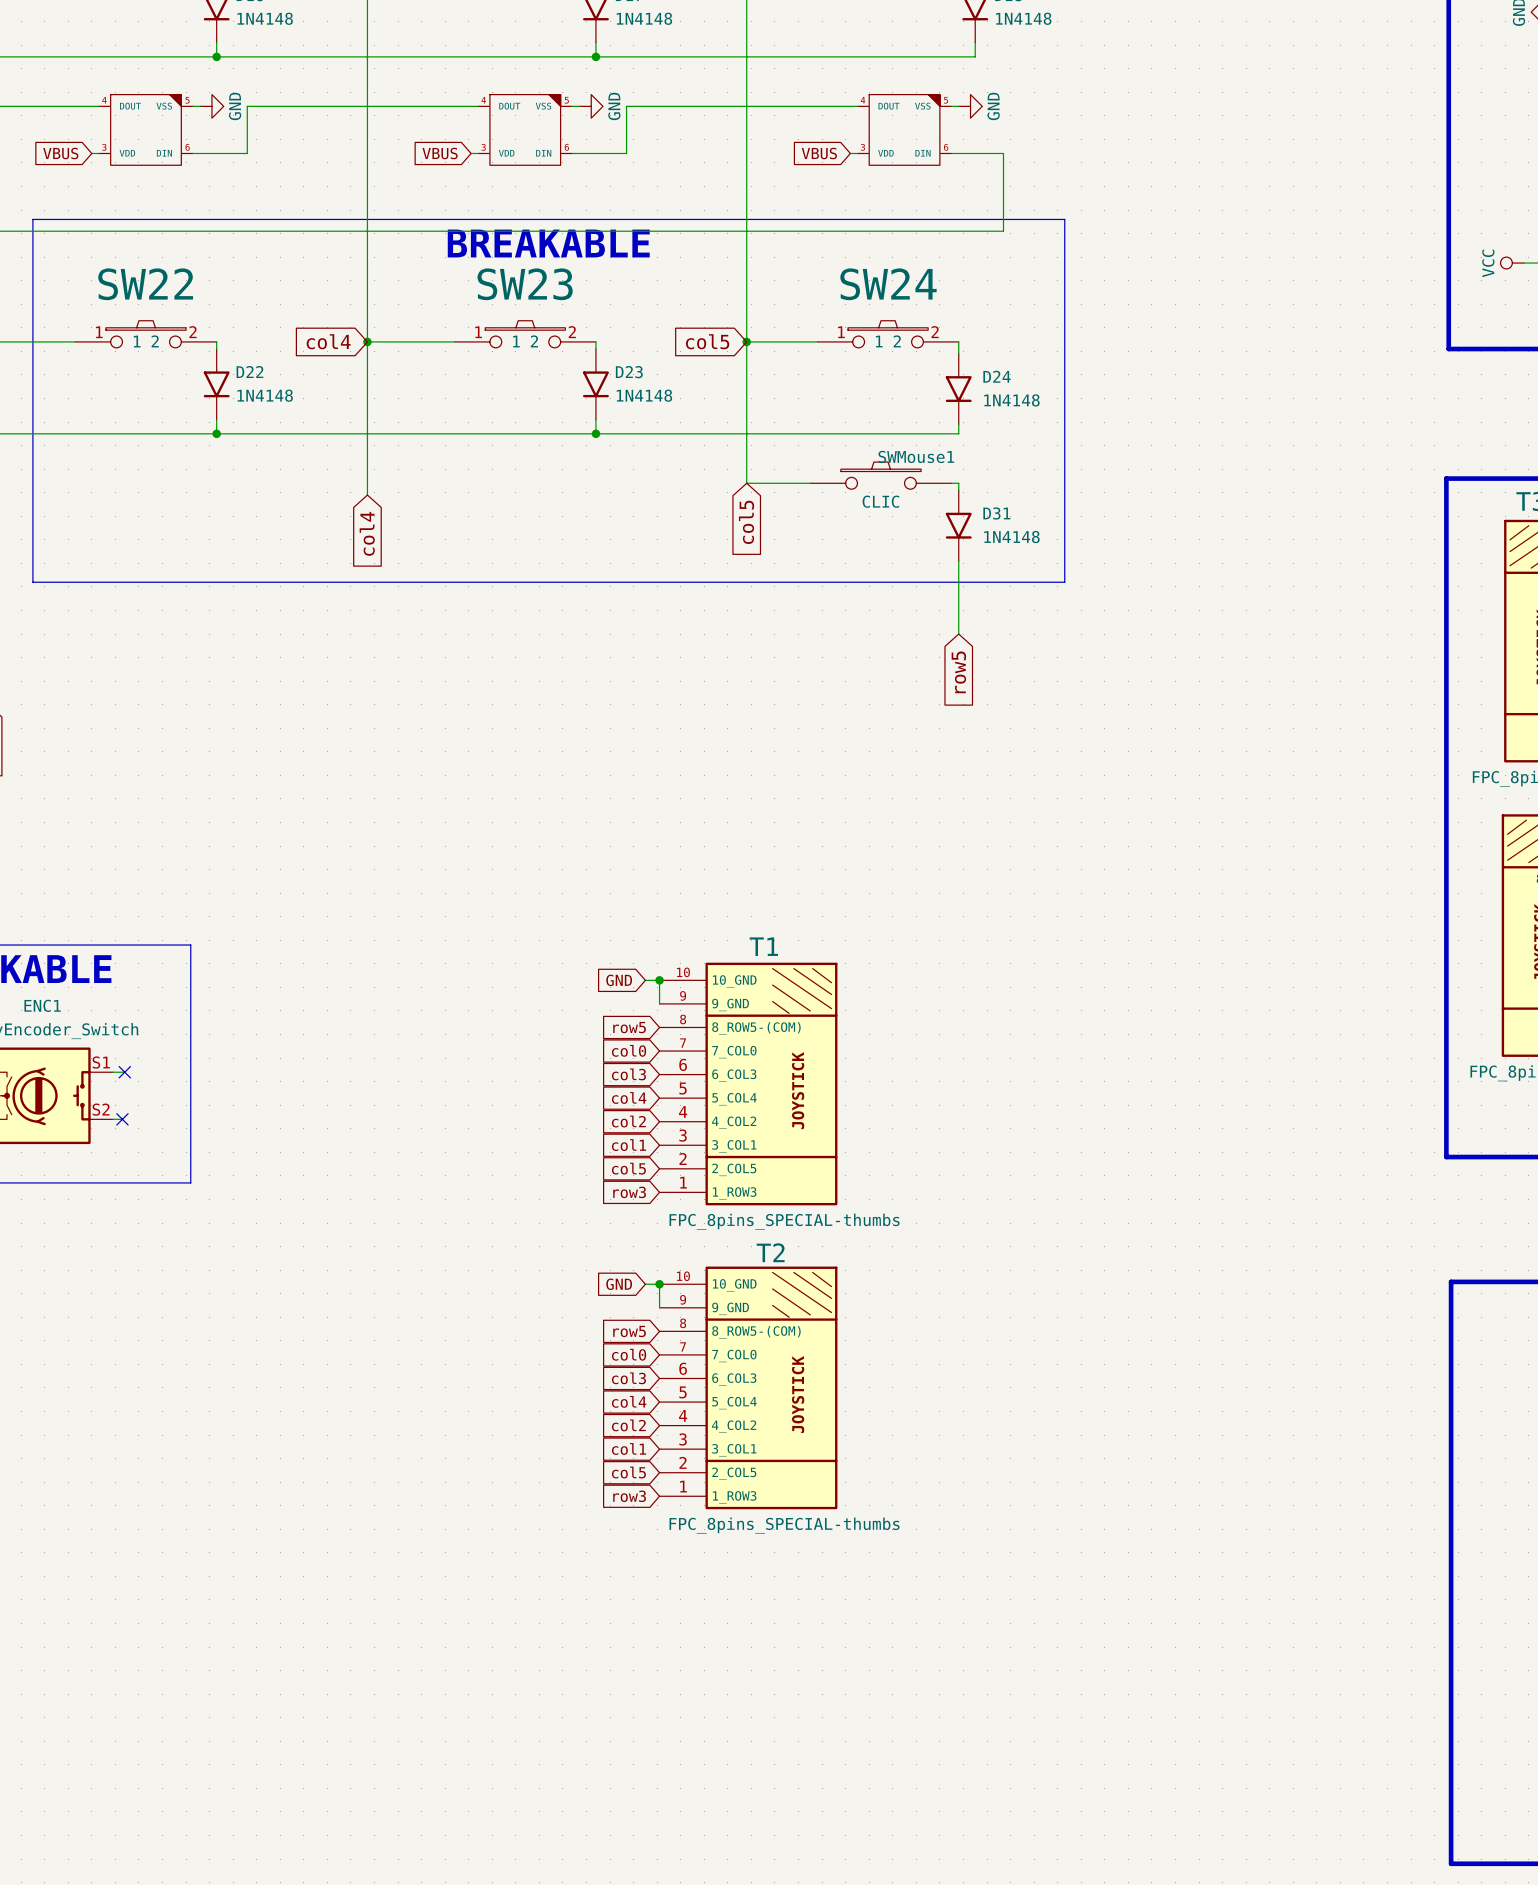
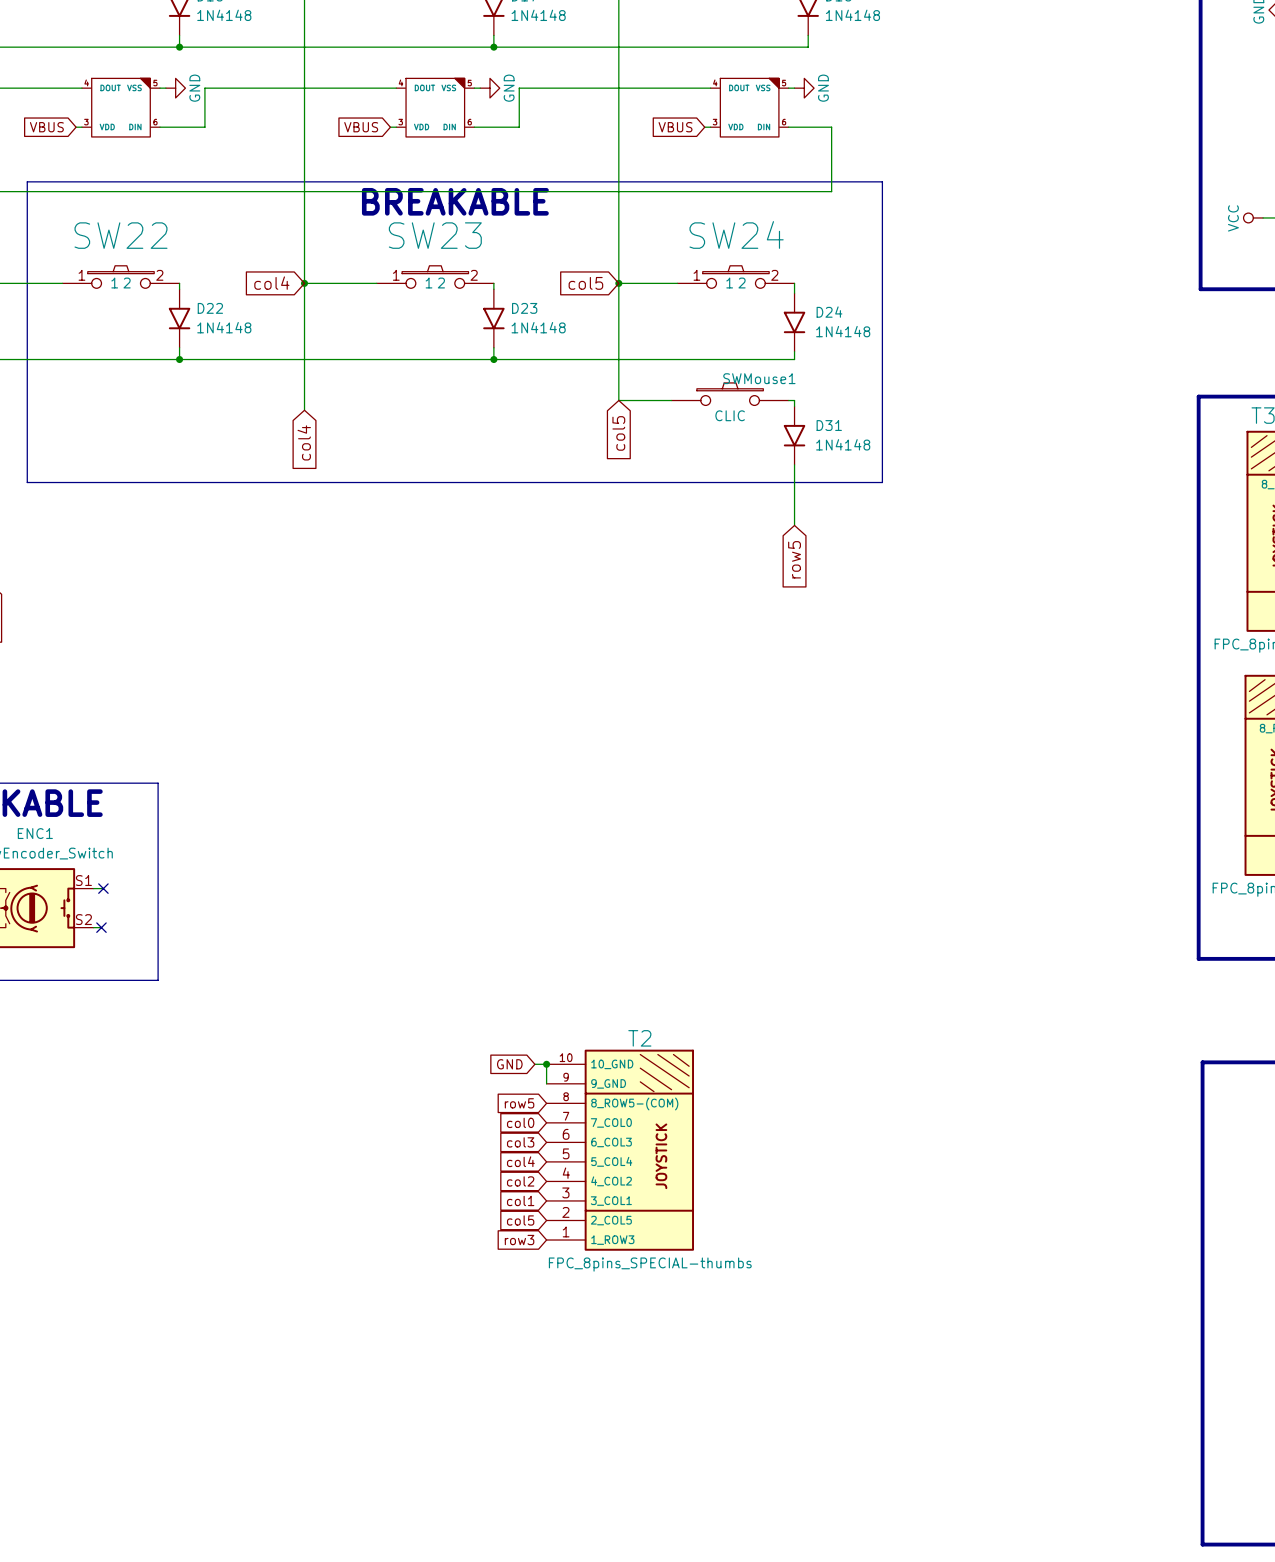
global label: GND (619, 980) -> none
wire: (645, 980) (659, 980) (659, 1003) -> none
junction: (659, 980) -> none
global label: row5 (629, 1027) -> none
global label: col0 (629, 1050) -> none
global label: col3 (628, 1074) -> none
T1: FPC_8pins_SPECIAL-thumbs (748, 1084) -> none
global label: col4 (629, 1097) -> none
global label: col2 (628, 1121) -> none
global label: col1 (629, 1145) -> none
global label: col5 (628, 1168) -> none
global label: row3 (629, 1192) -> none

